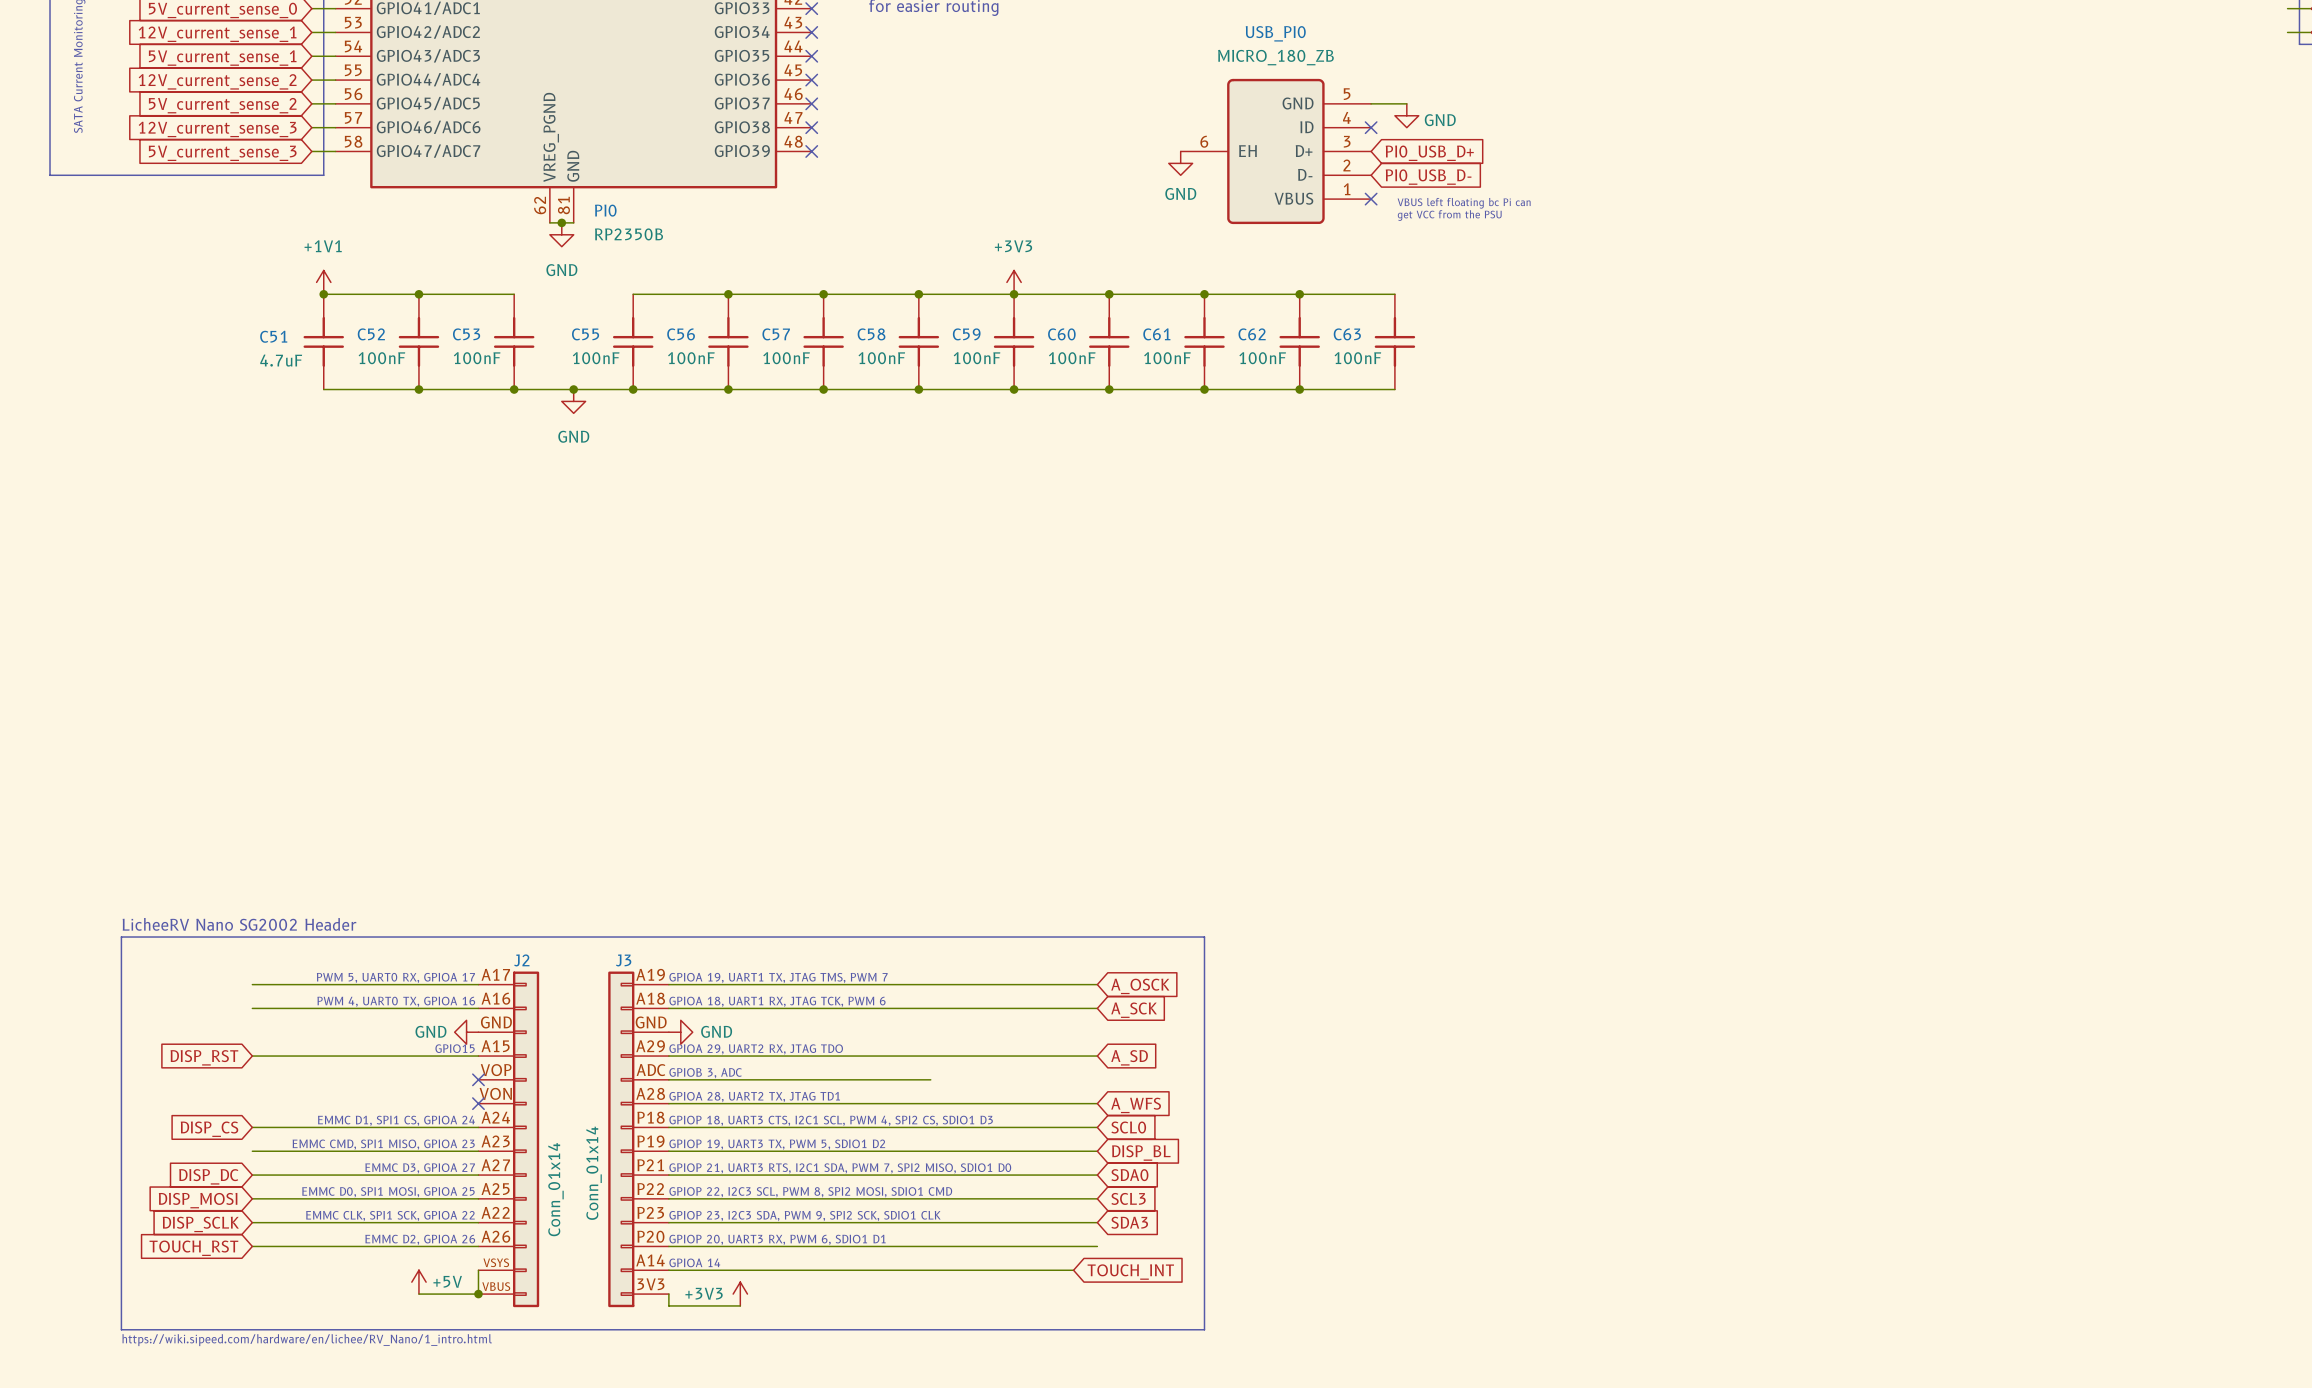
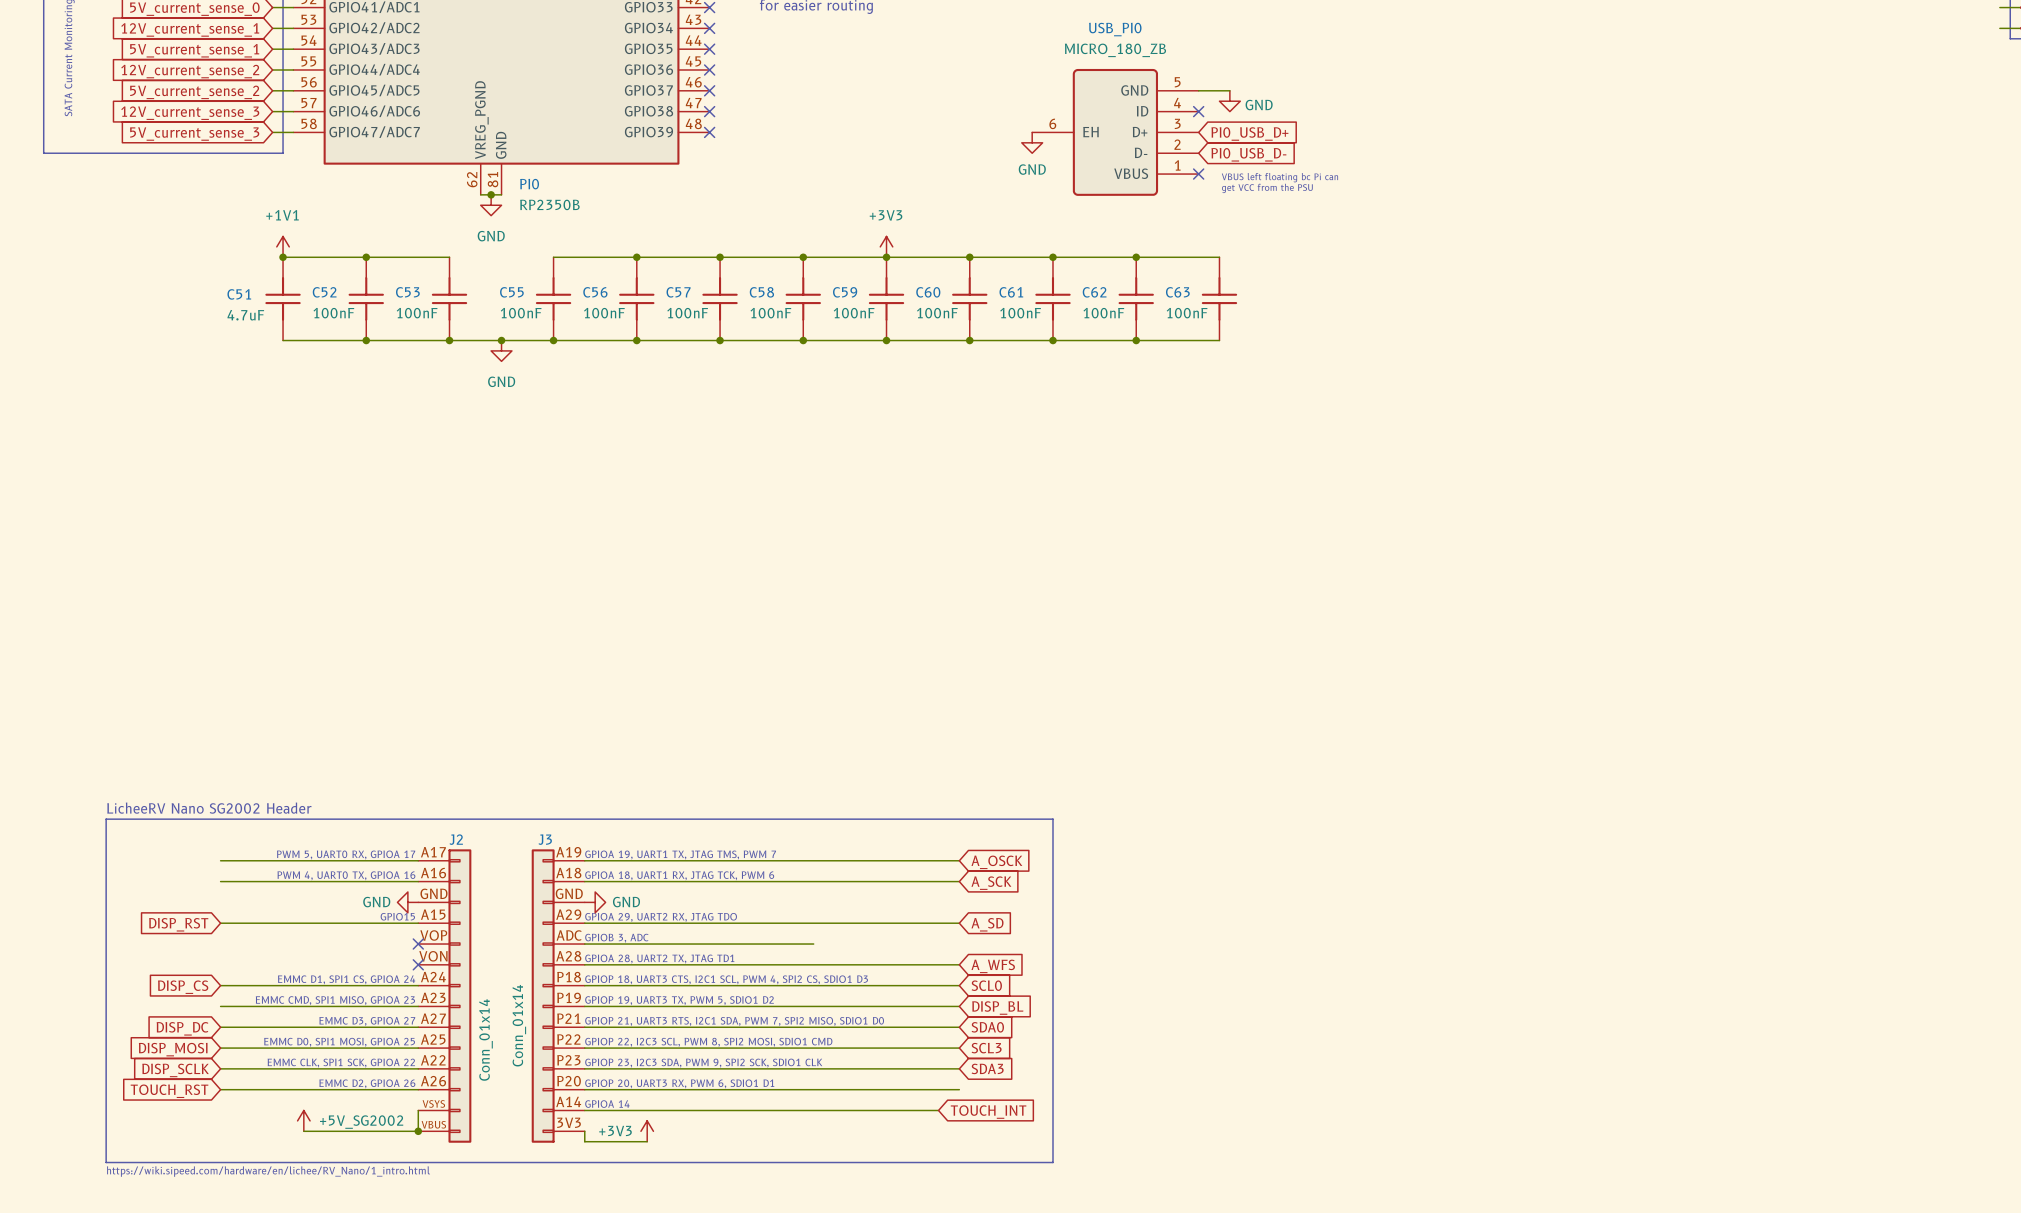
power symbol: none -> +5V_SG2002 (303, 1120)
power symbol: +5V (418, 1282) -> none
wire: none -> (303, 1131) (366, 1131)

